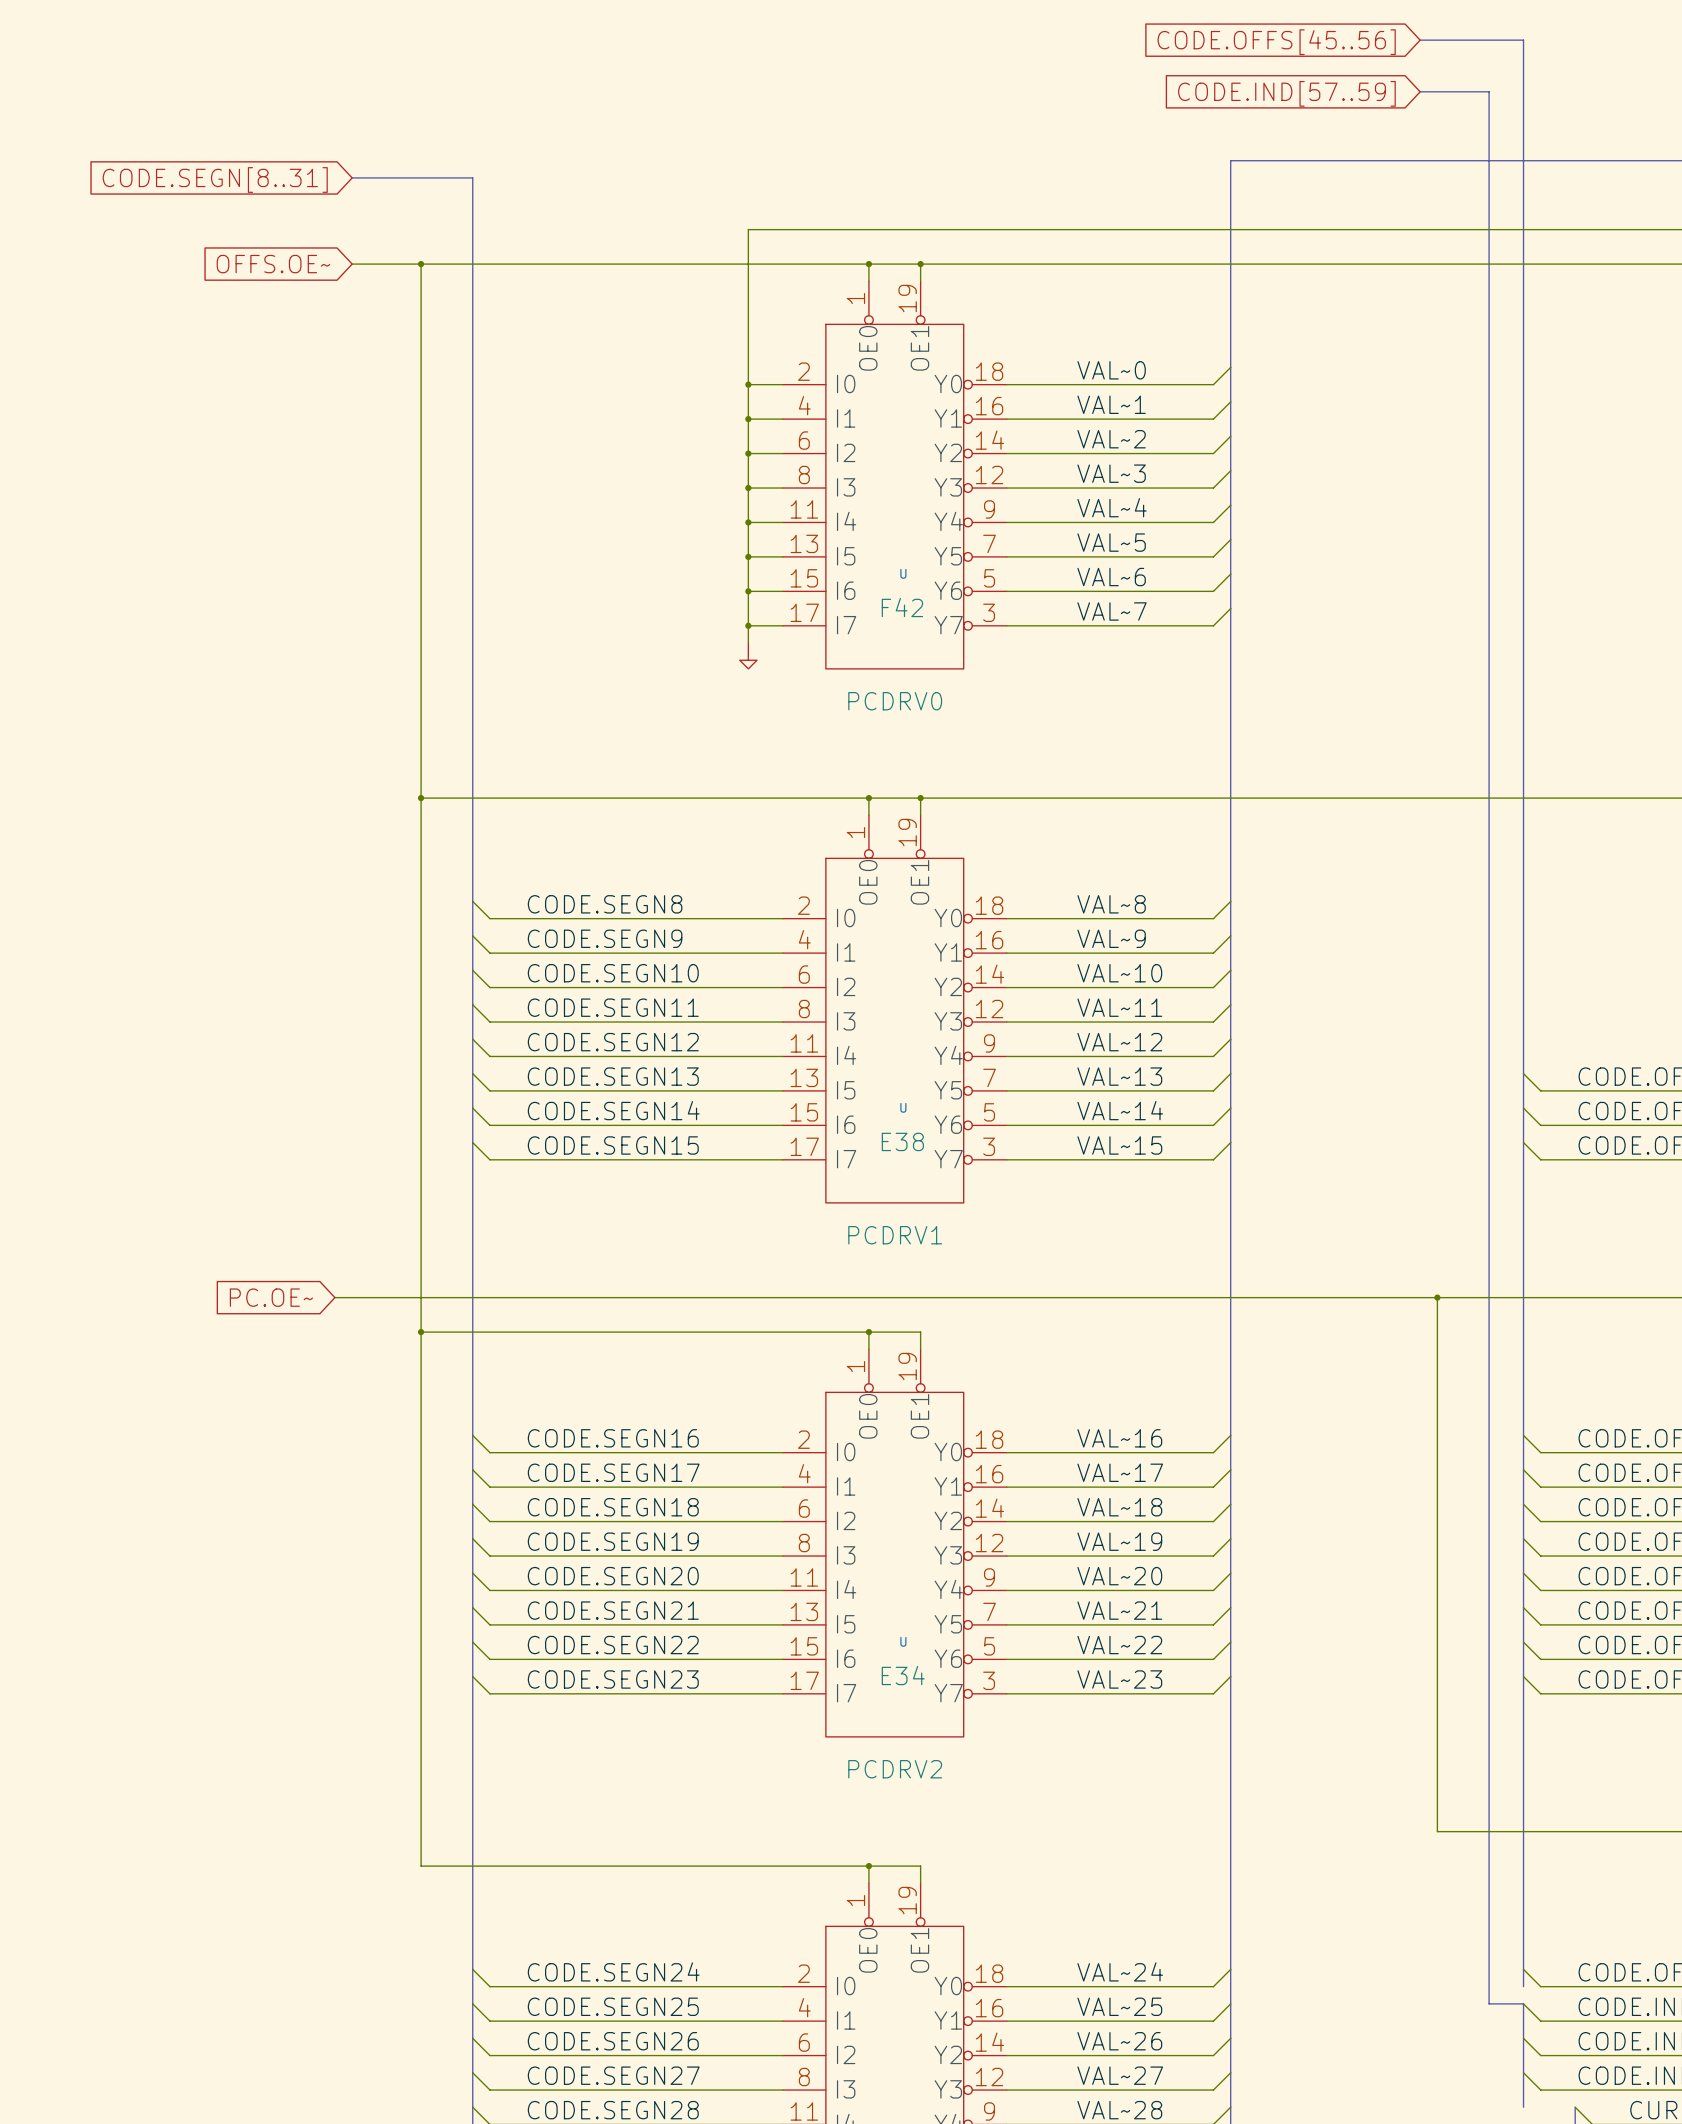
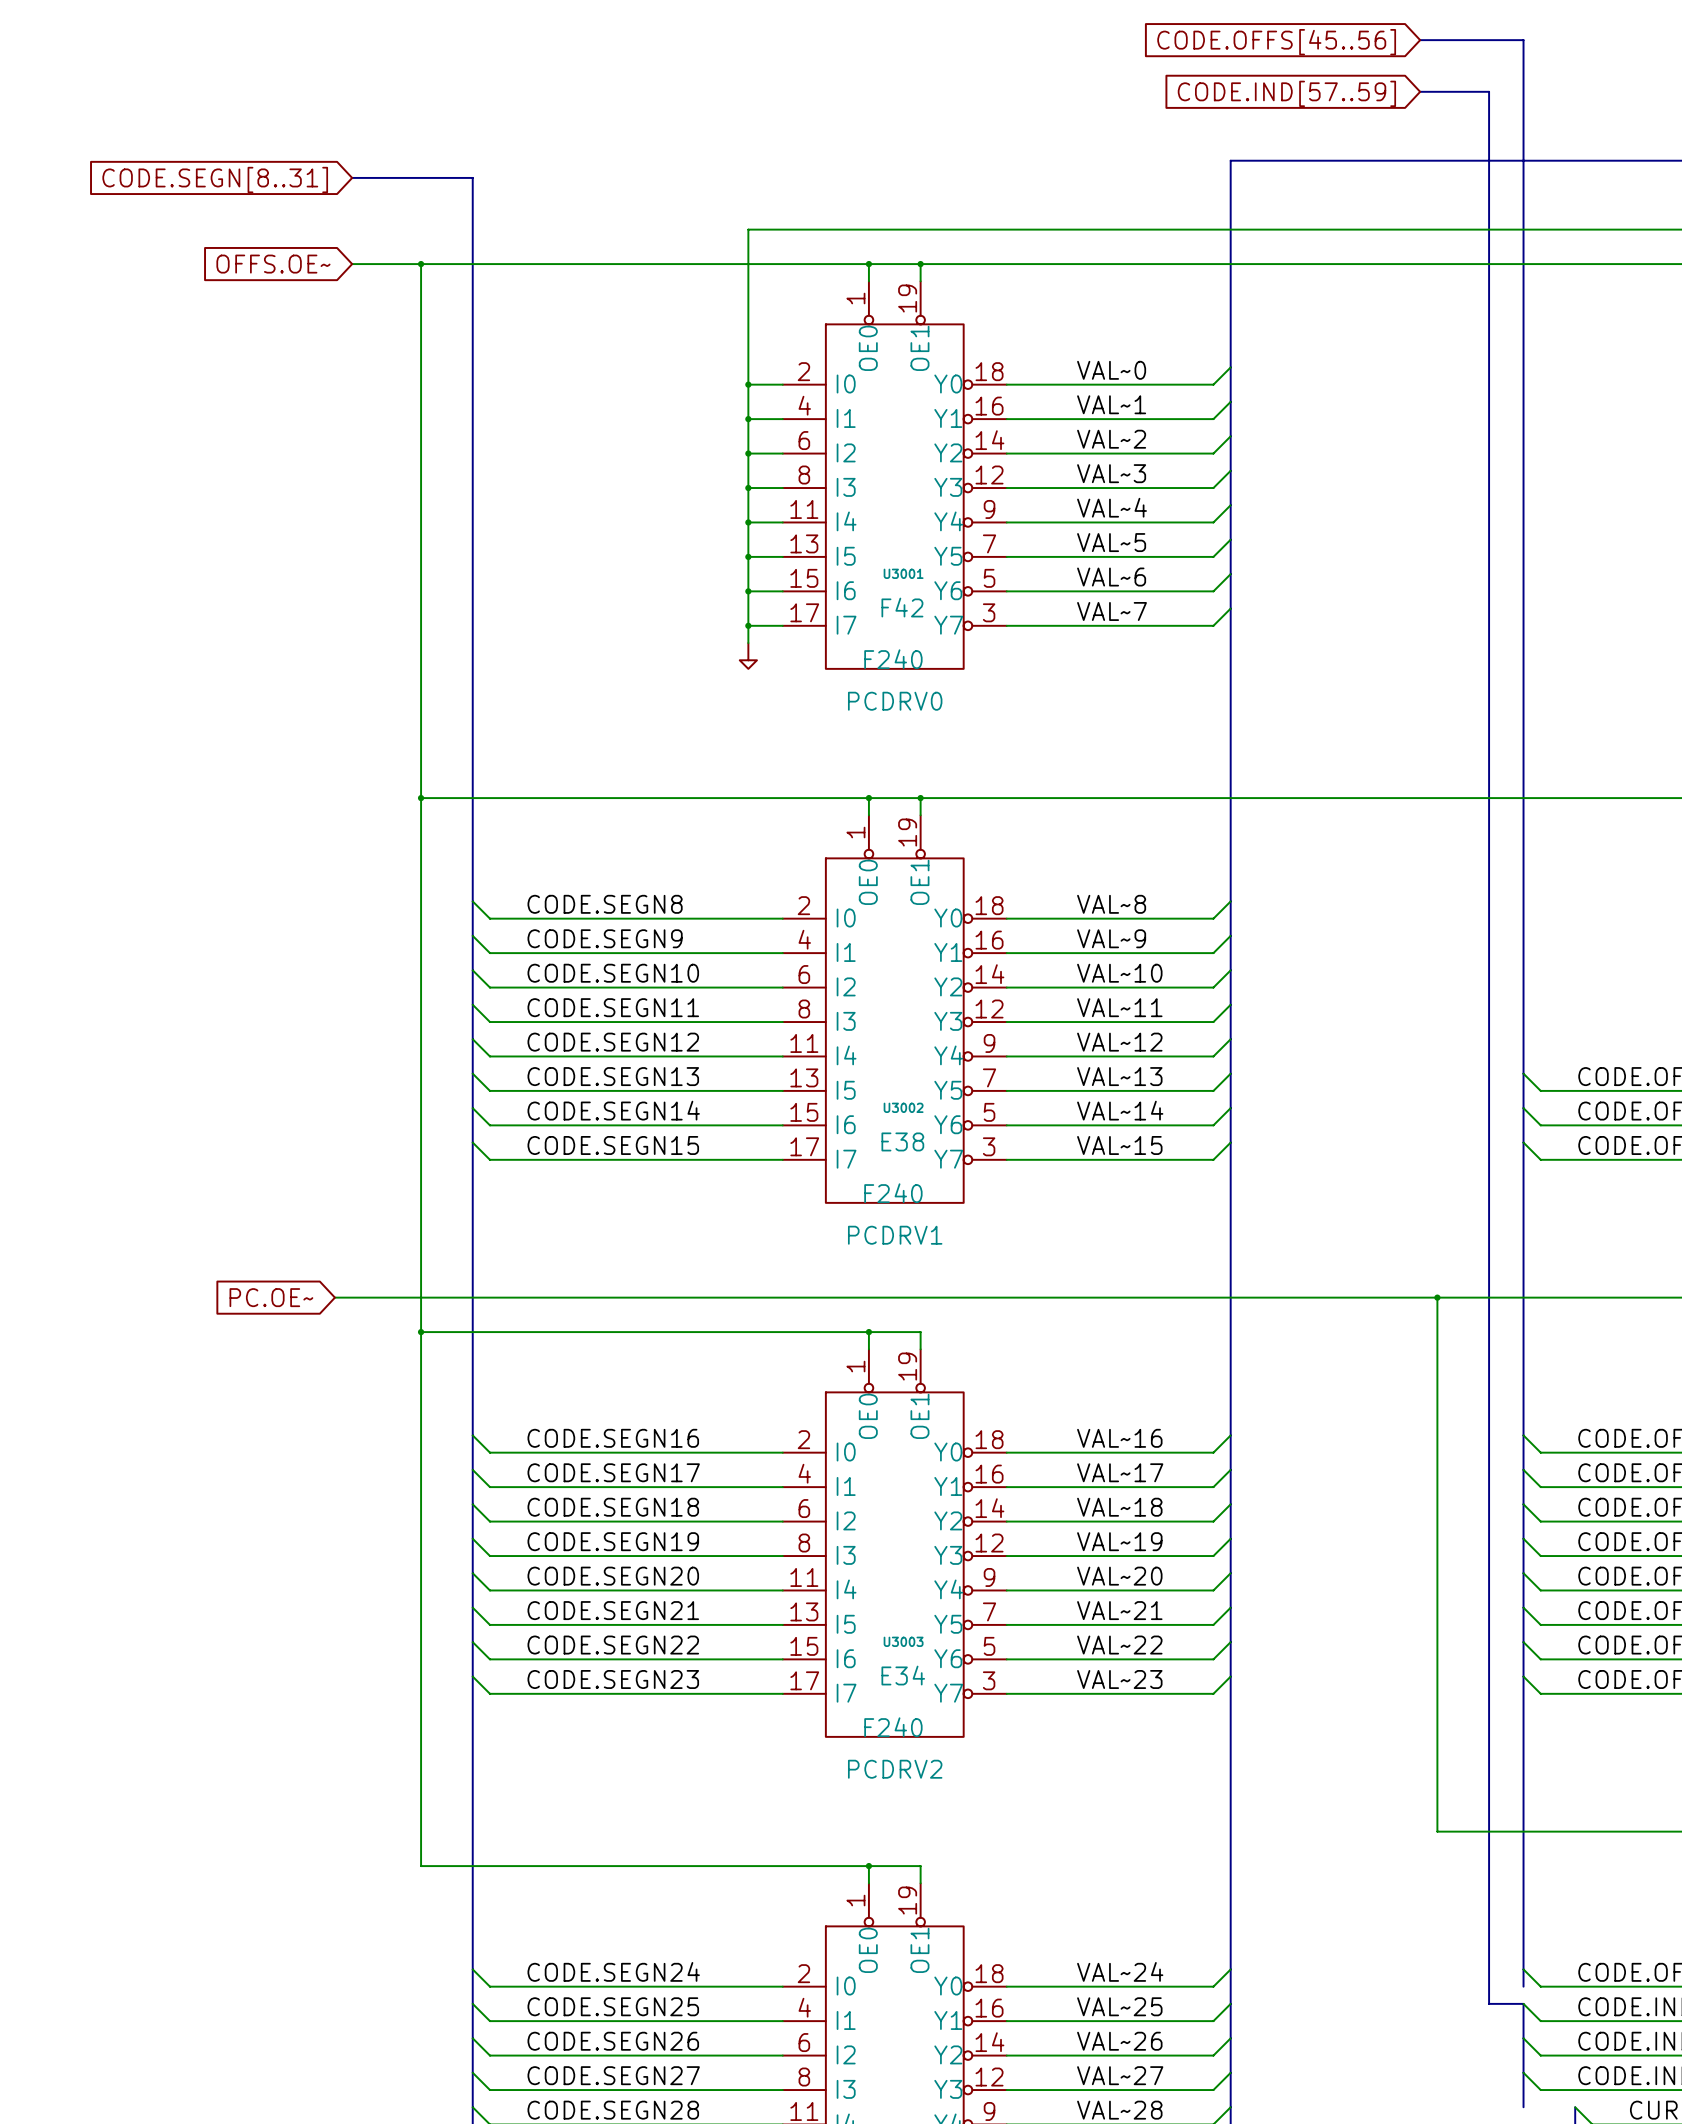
U name: U (903, 573) -> U3001 (903, 573)
U value: none -> F240 (893, 659)
U name: U (903, 1107) -> U3002 (903, 1107)
U value: none -> F240 (893, 1193)
U name: U (903, 1641) -> U3003 (903, 1641)
U value: none -> F240 (893, 1727)

